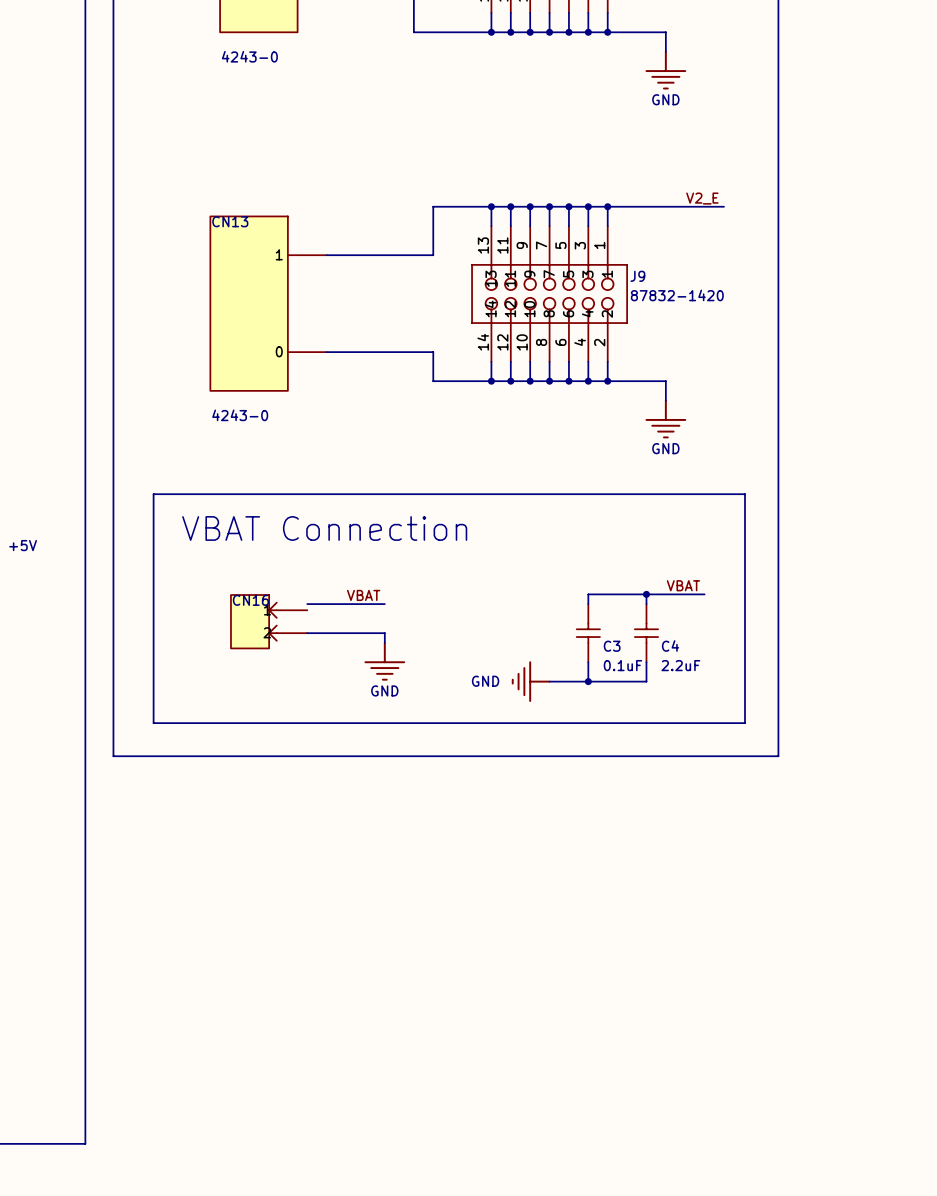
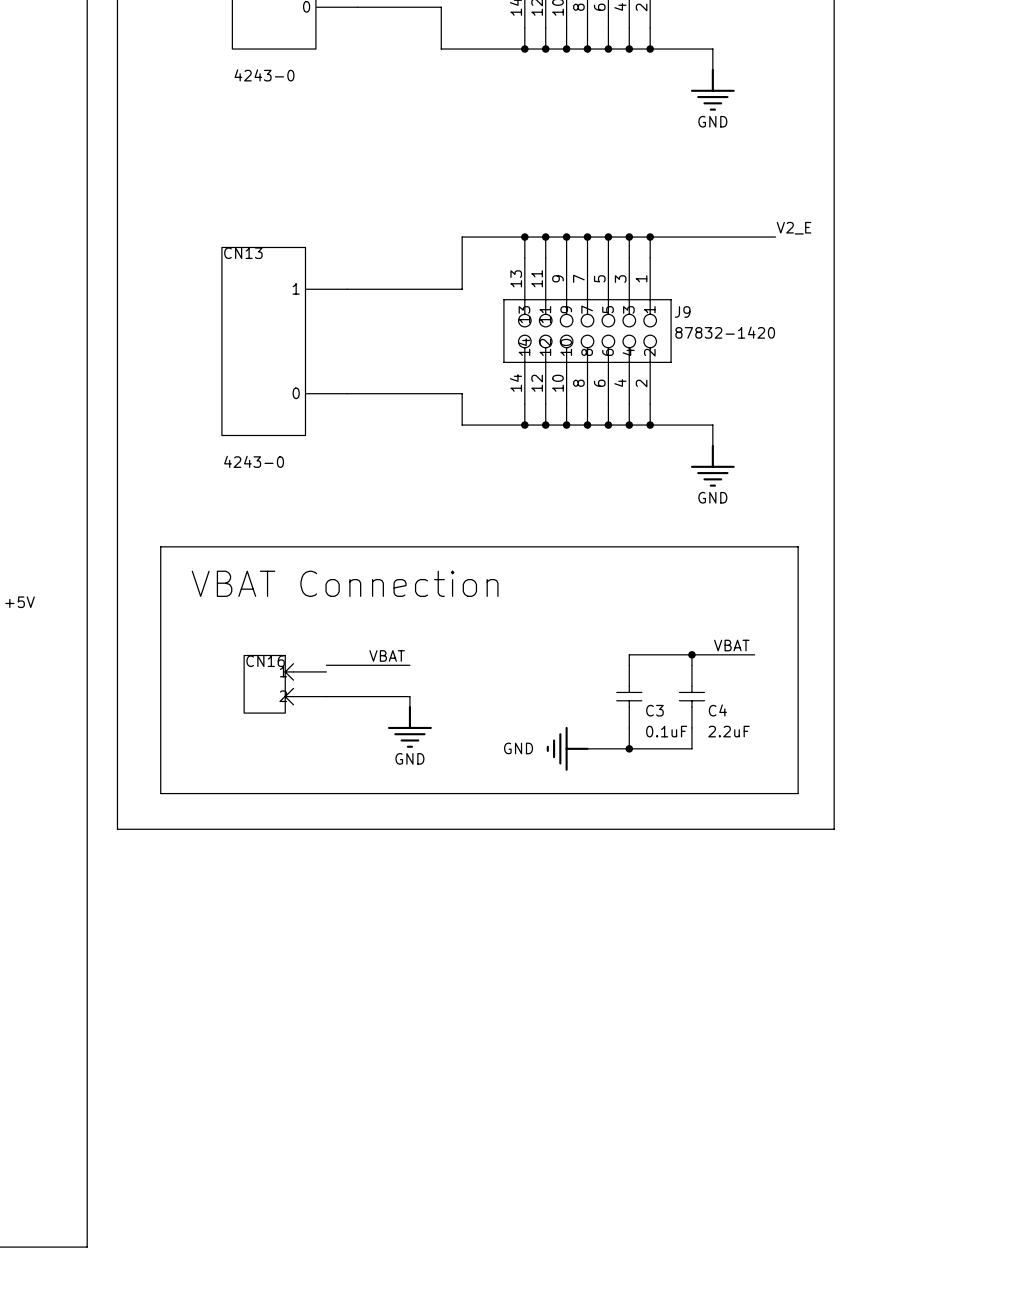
label position: V2_E (702, 198) -> V2_E (794, 228)

